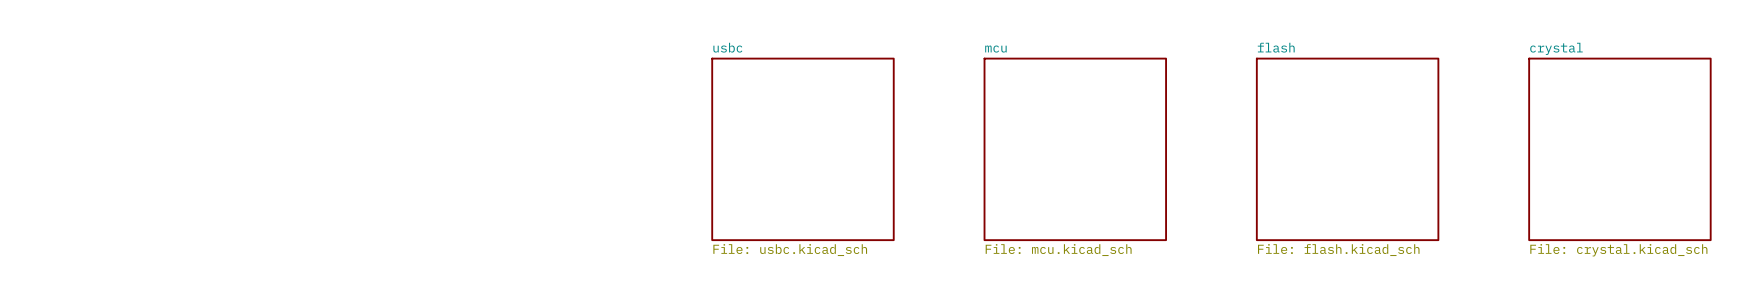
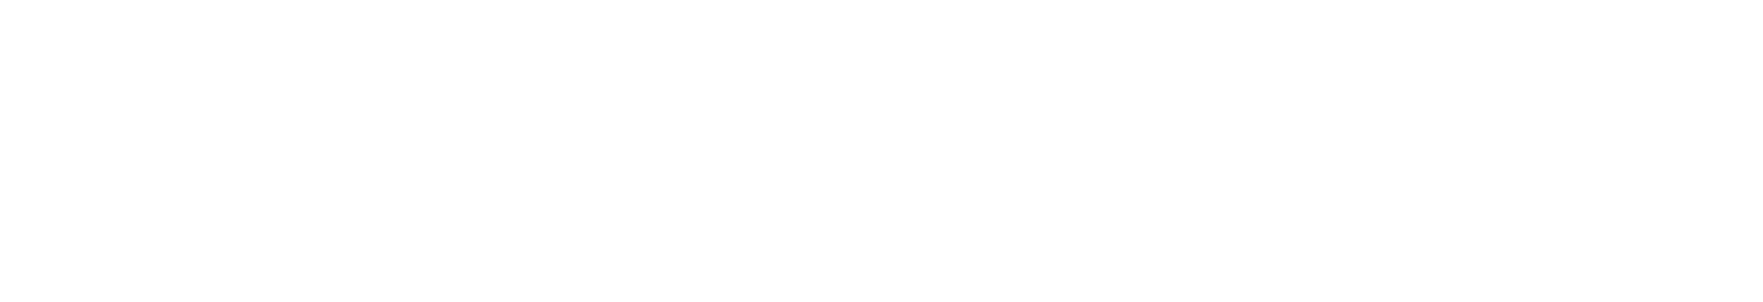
sheet usbc: File: usbc.kicad_sch (802, 149) -> none
sheet mcu: File: mcu.kicad_sch (1075, 149) -> none
sheet flash: File: flash.kicad_sch (1347, 149) -> none
sheet crystal: File: crystal.kicad_sch (1619, 149) -> none

